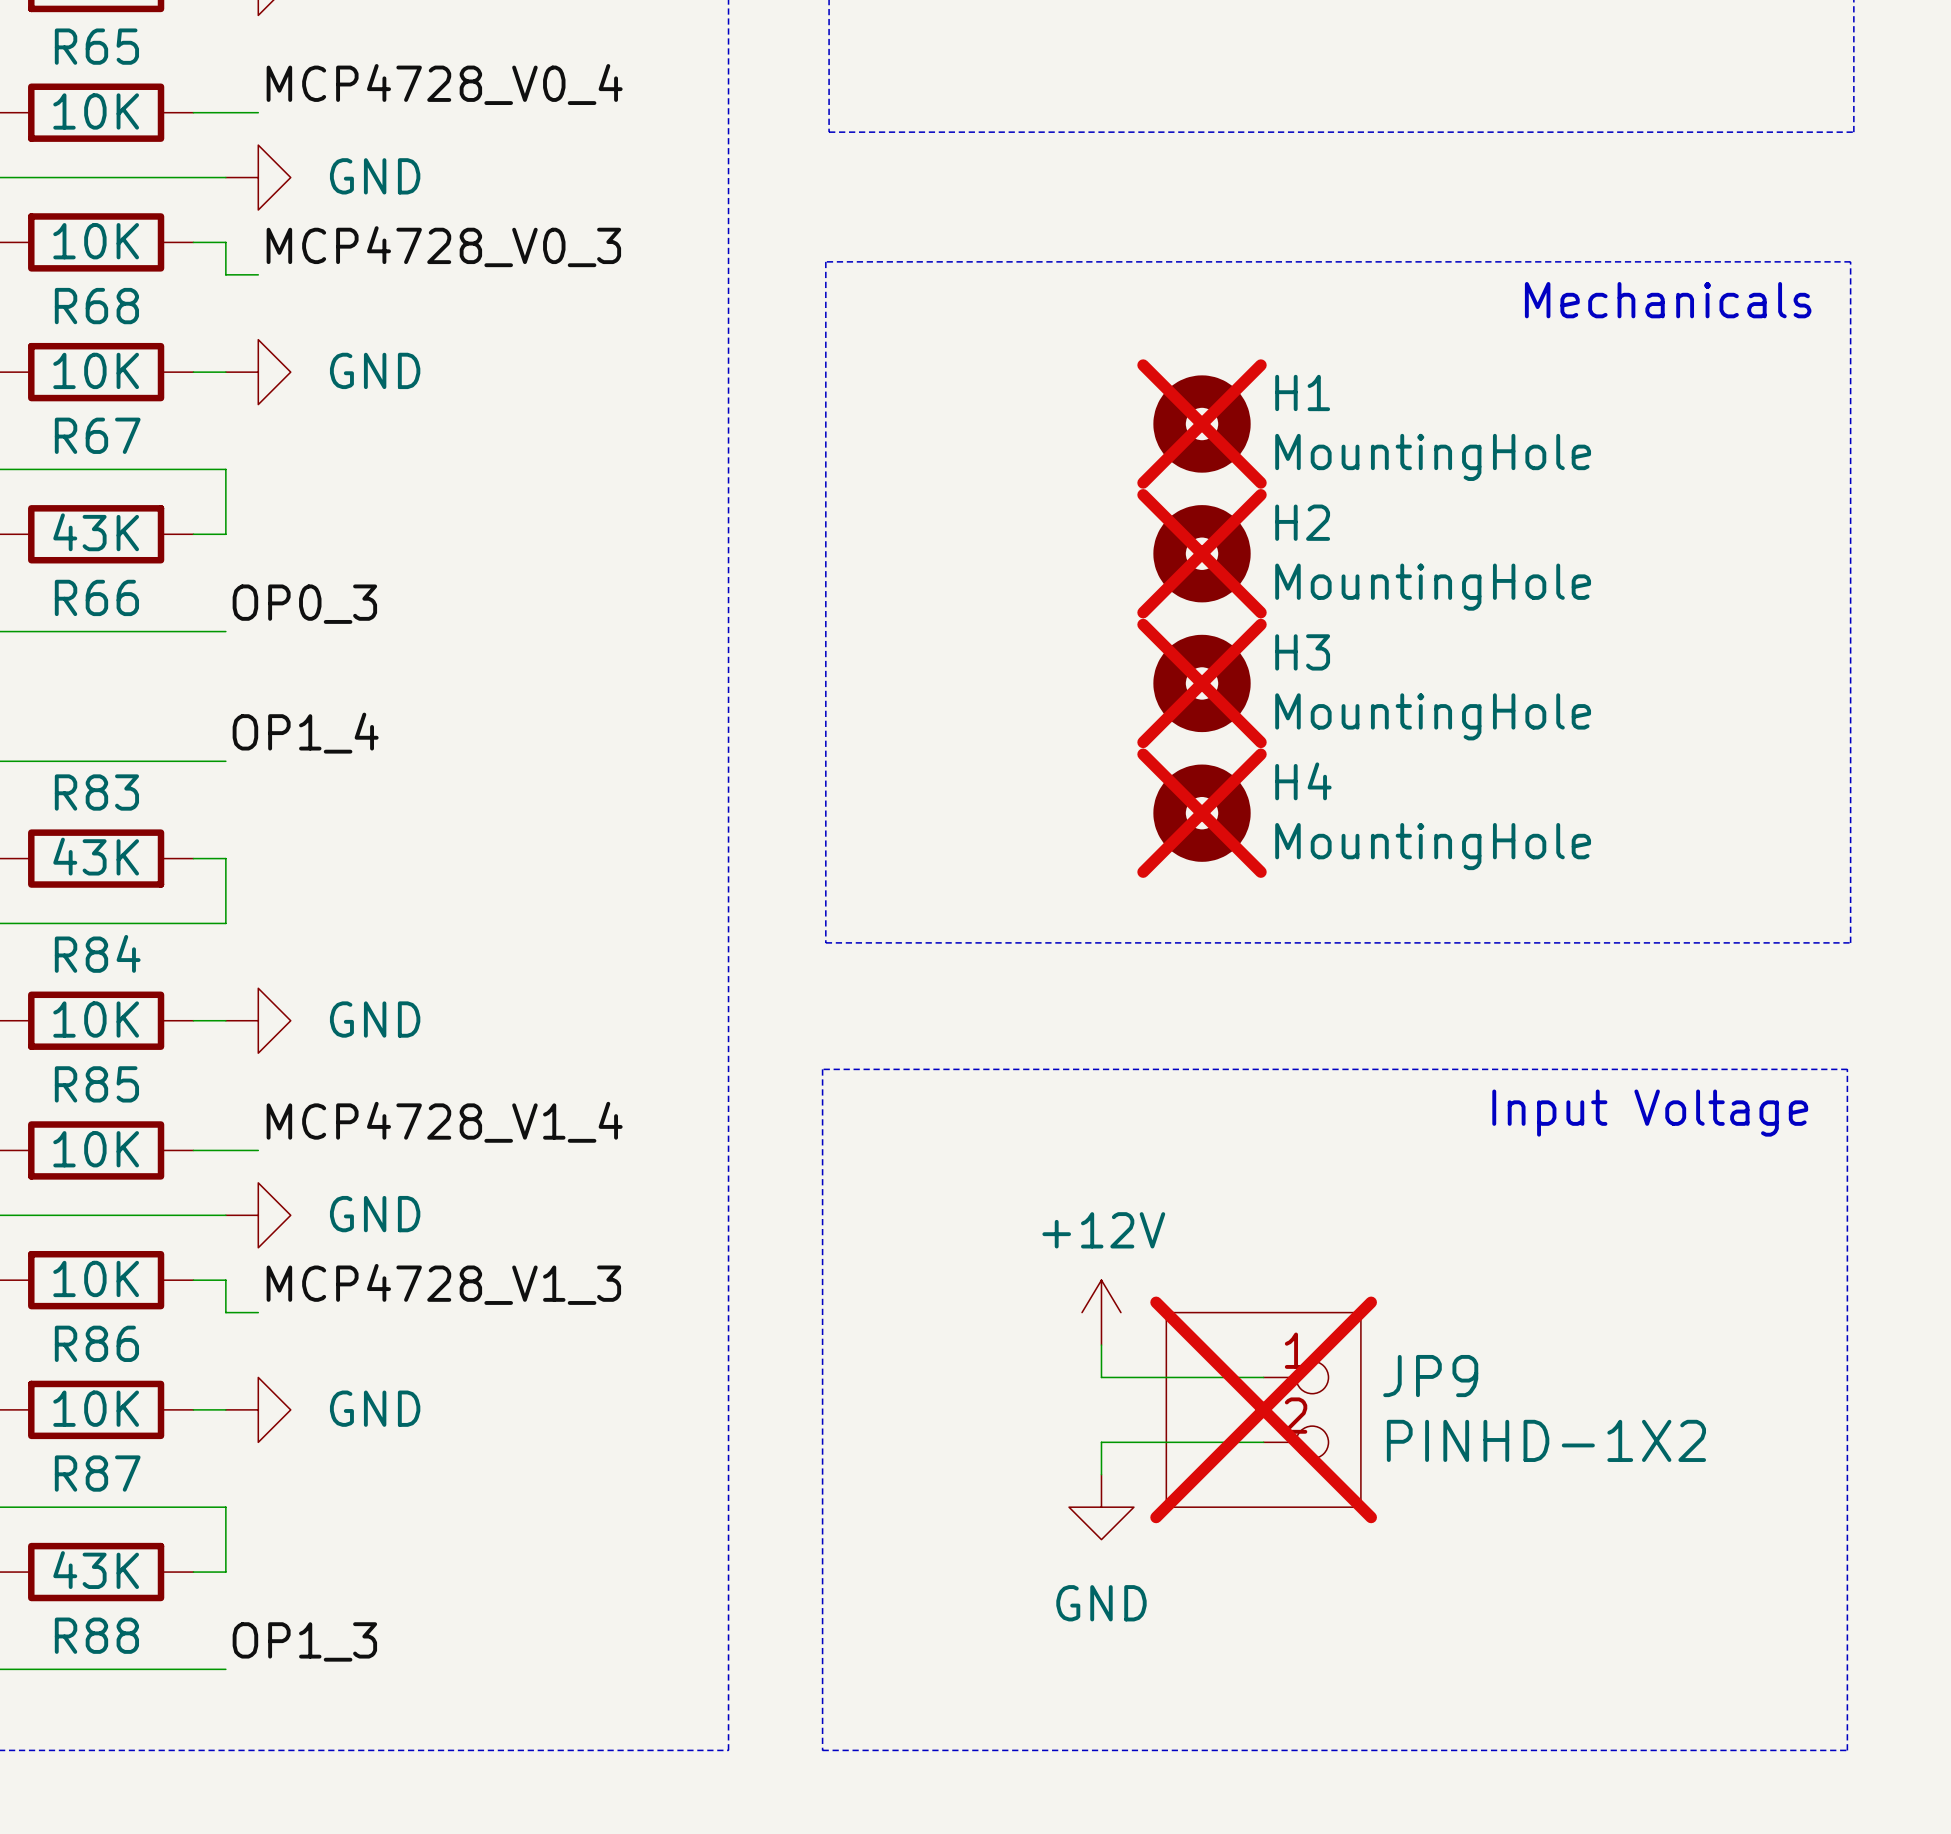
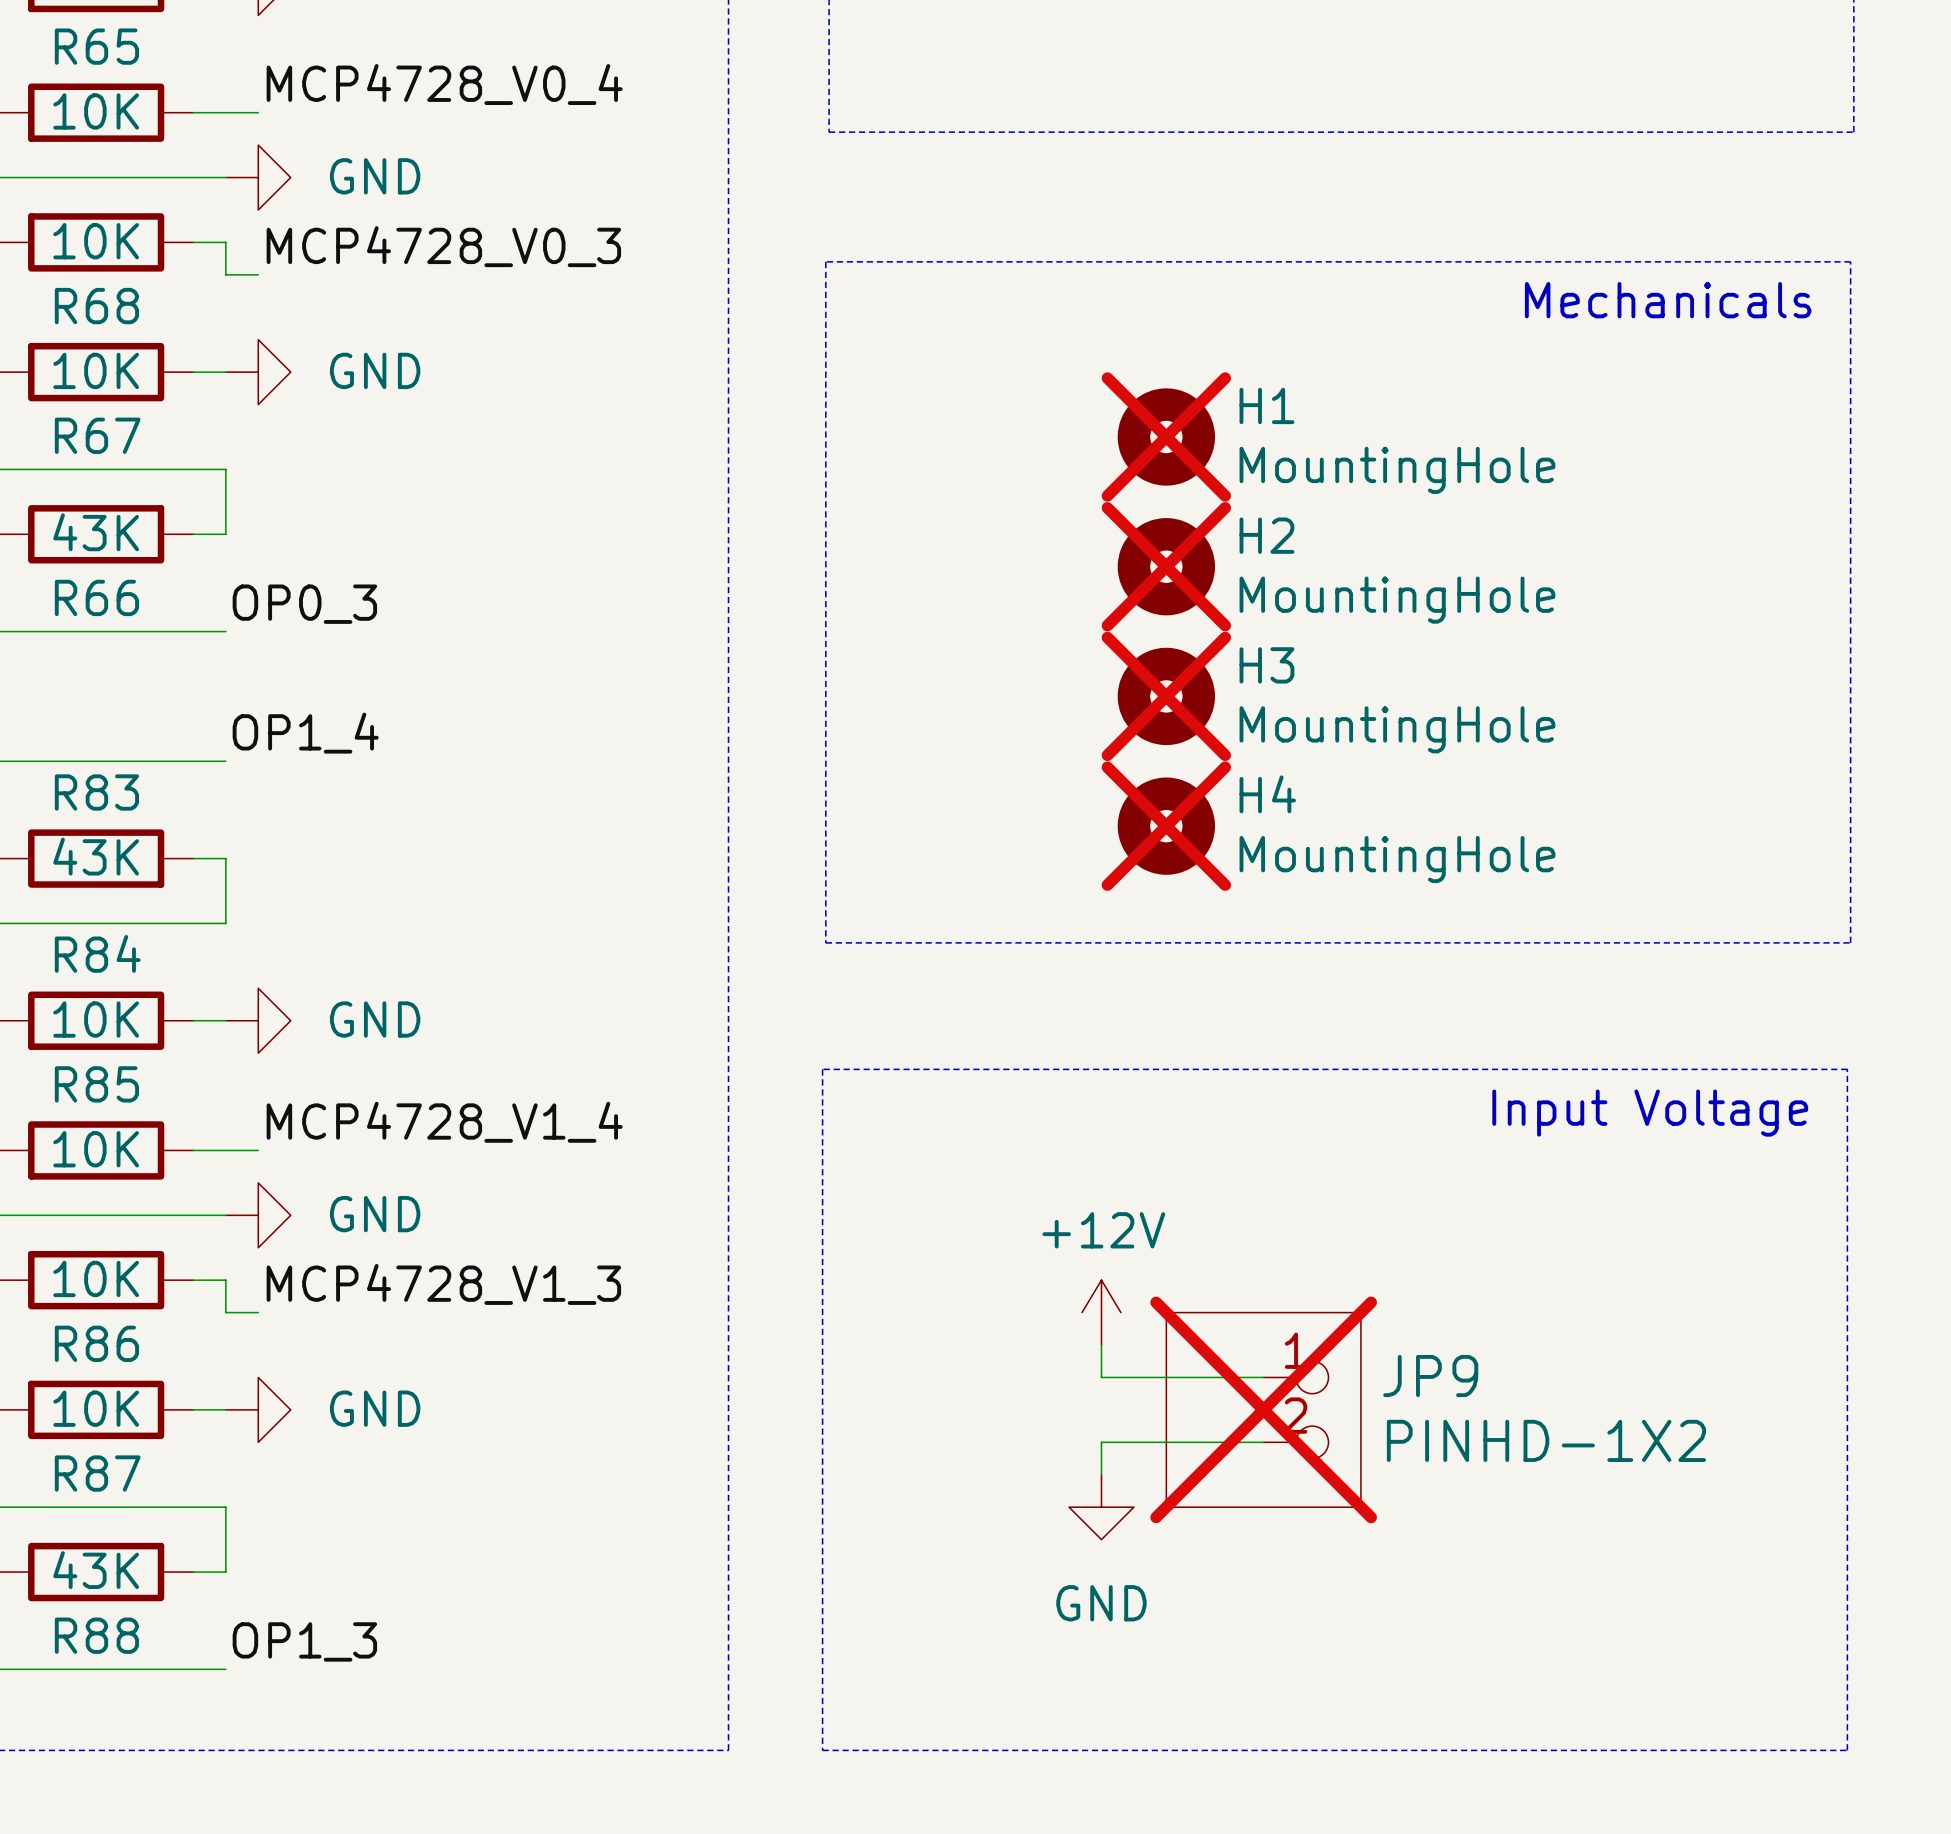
H1 position: (1202, 424) -> (1166, 436)
H2 position: (1202, 553) -> (1166, 566)
H3 position: (1202, 683) -> (1166, 696)
H4 position: (1202, 813) -> (1166, 826)

